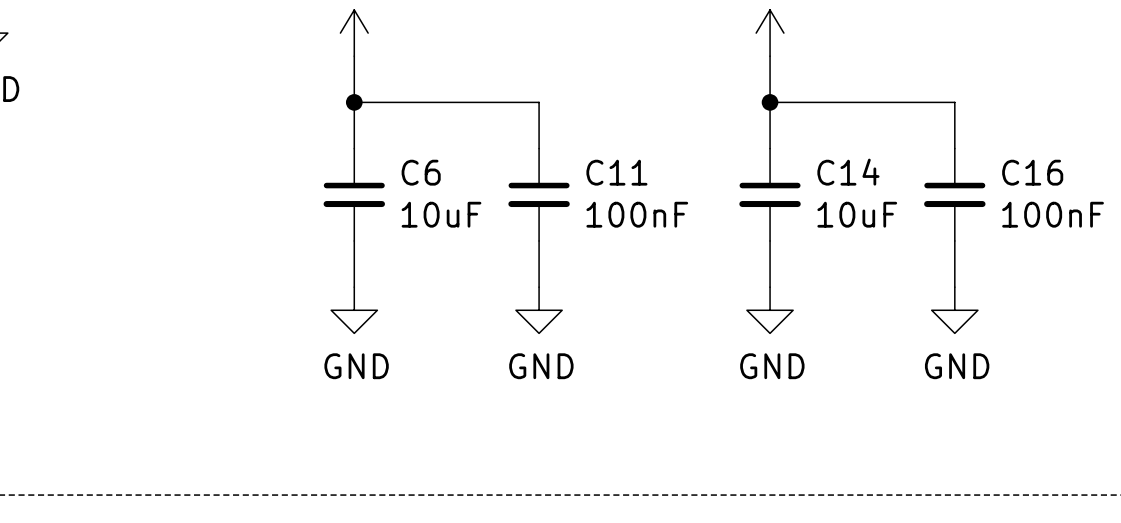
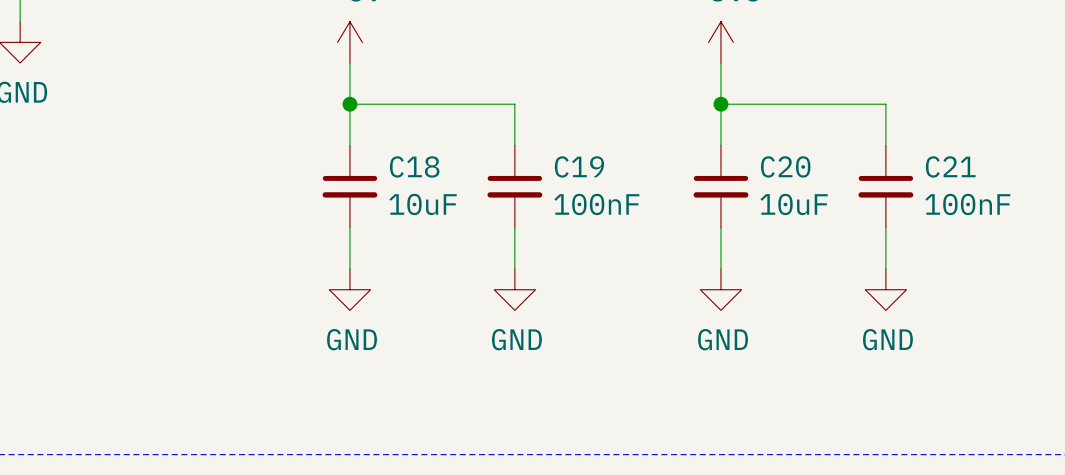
C6 name: C6 (421, 172) -> C18 (414, 166)
C11 name: C11 (616, 172) -> C19 (579, 166)
C14 name: C14 (848, 172) -> C20 (785, 166)
C16 name: C16 (1032, 172) -> C21 (950, 166)

